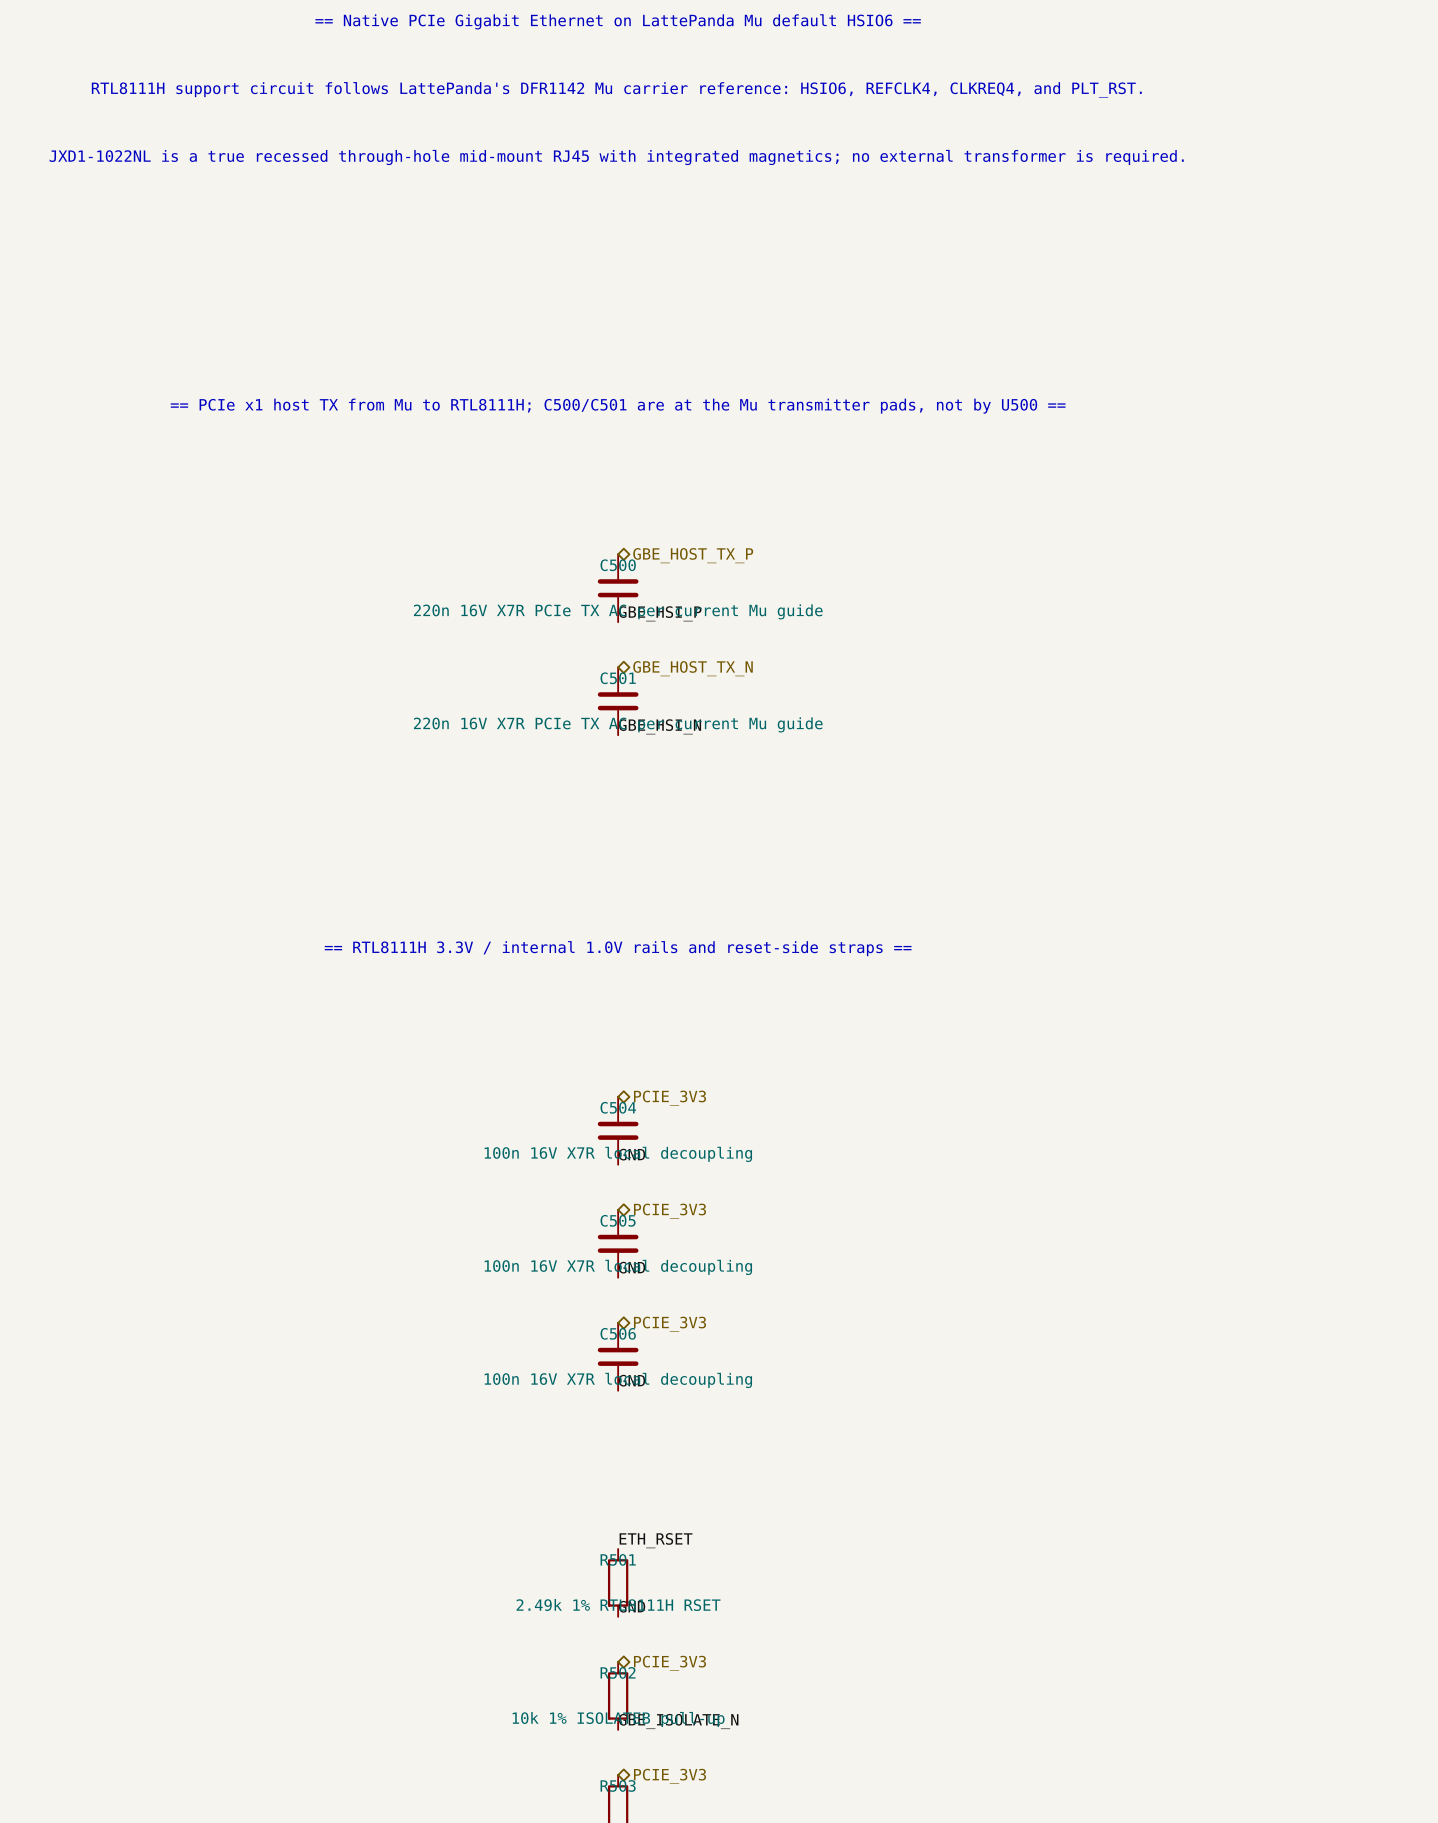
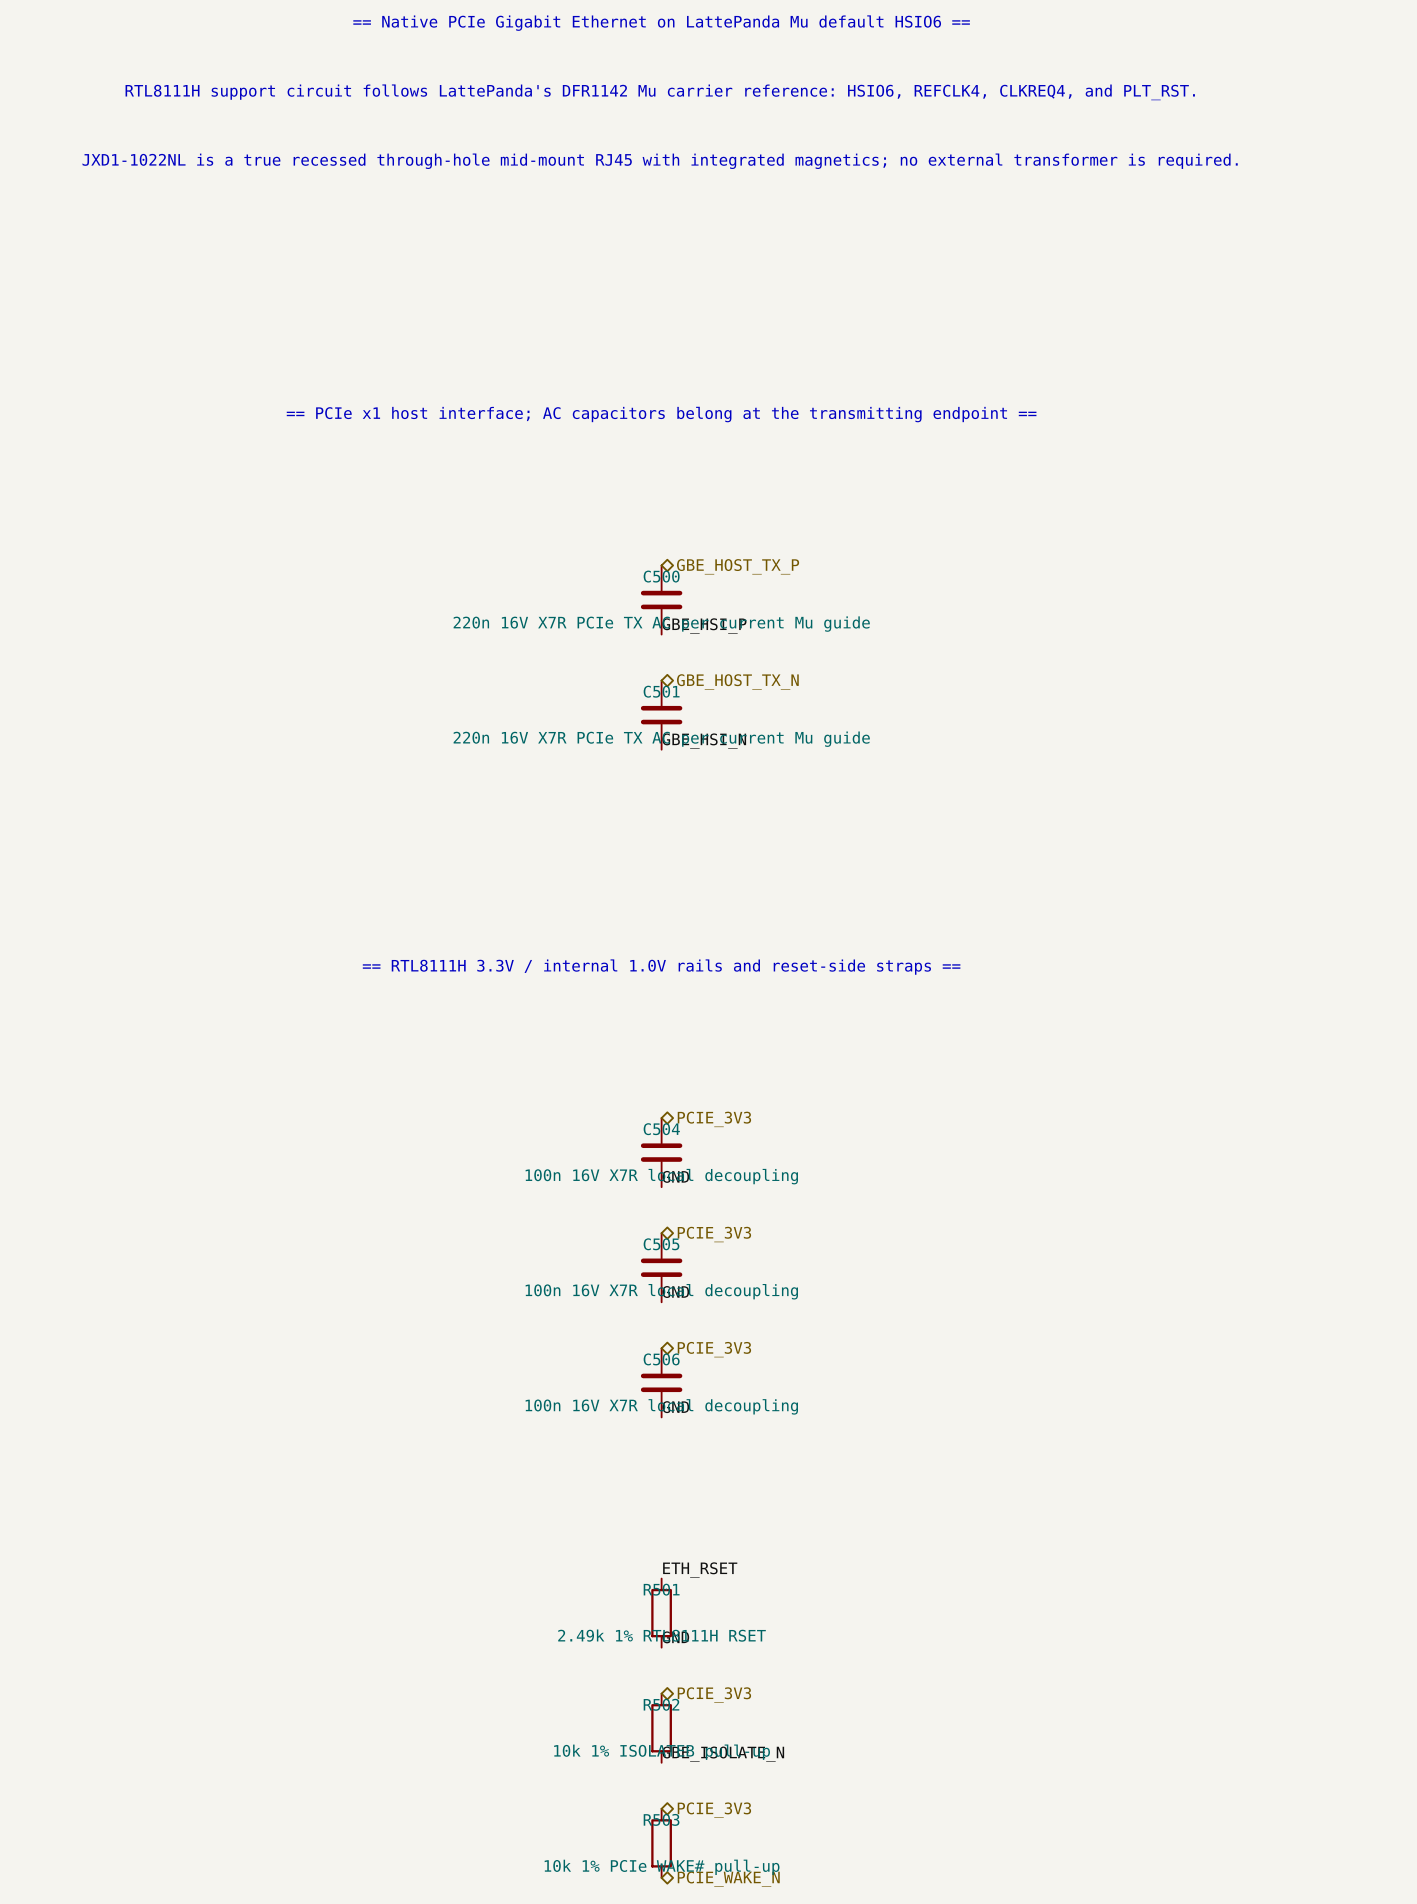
text: == PCIe x1 host TX from Mu to RTL8111H; C500/C501 are at the Mu transmitter pads, not by U500 == (618, 406) -> == PCIe x1 host interface; AC capacitors belong at the transmitting endpoint == (661, 414)

